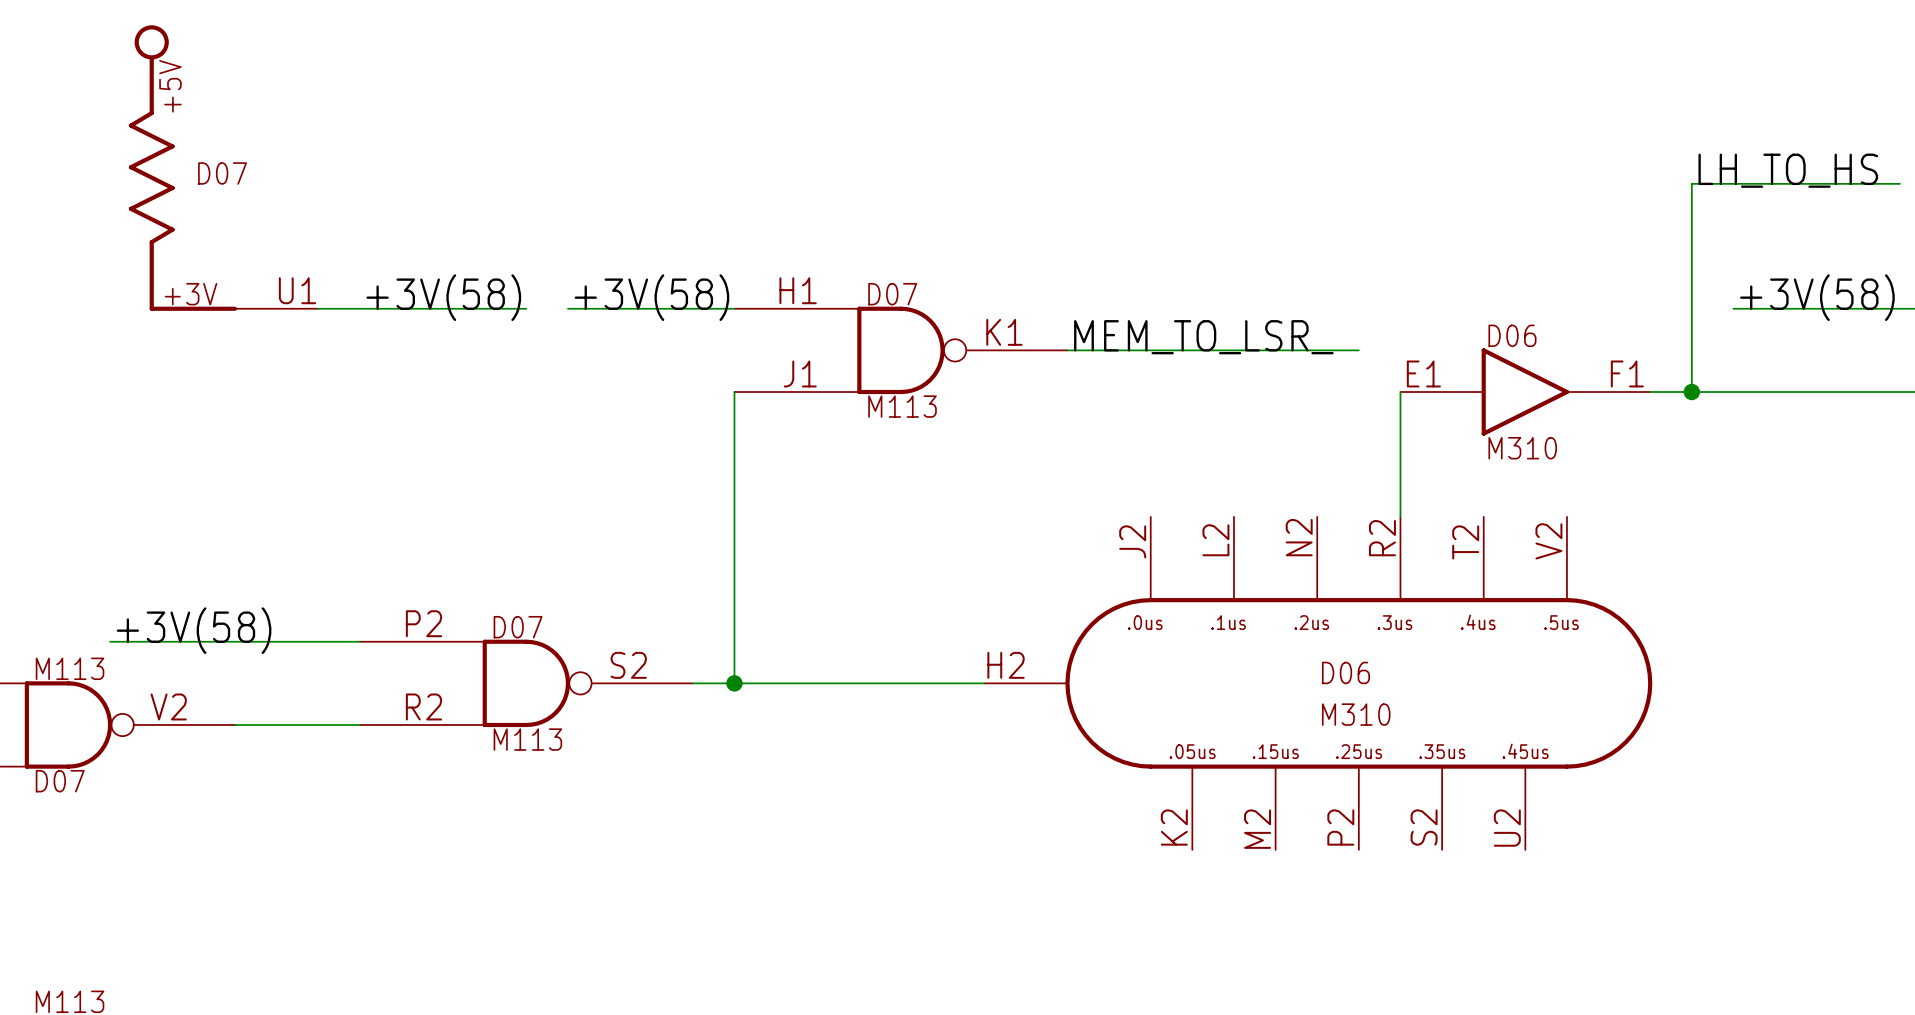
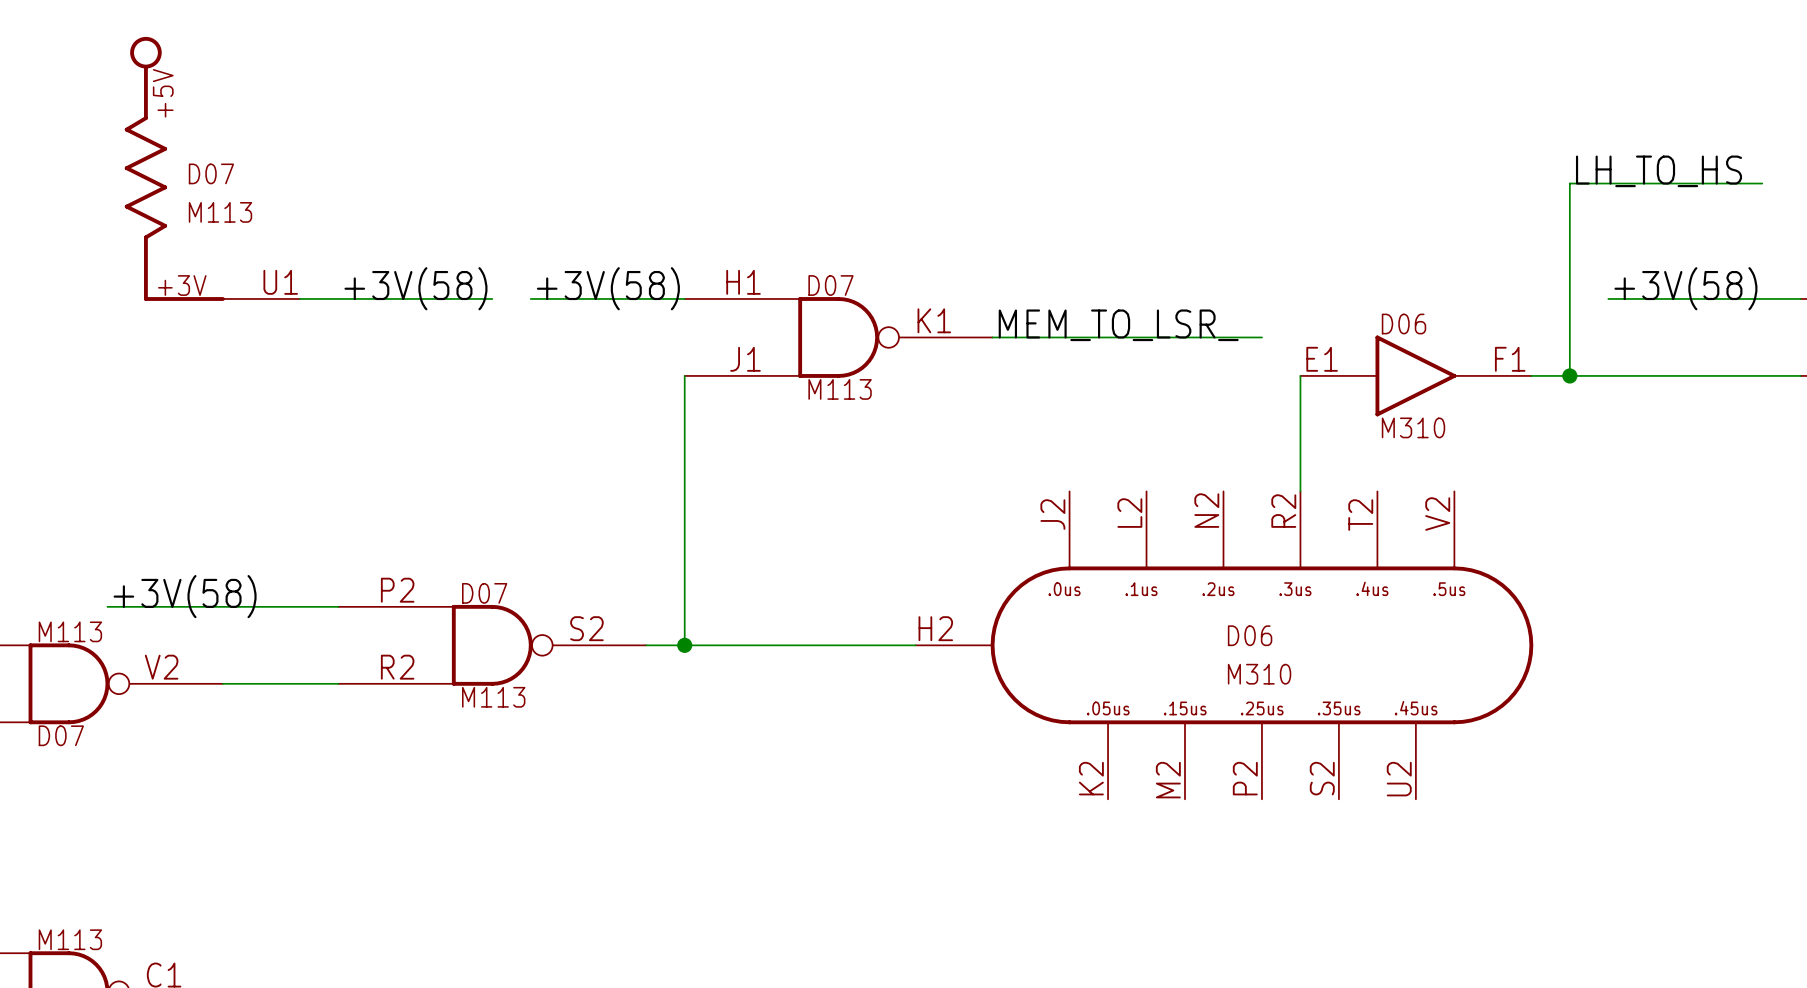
D07 value: none -> M113 (220, 212)

